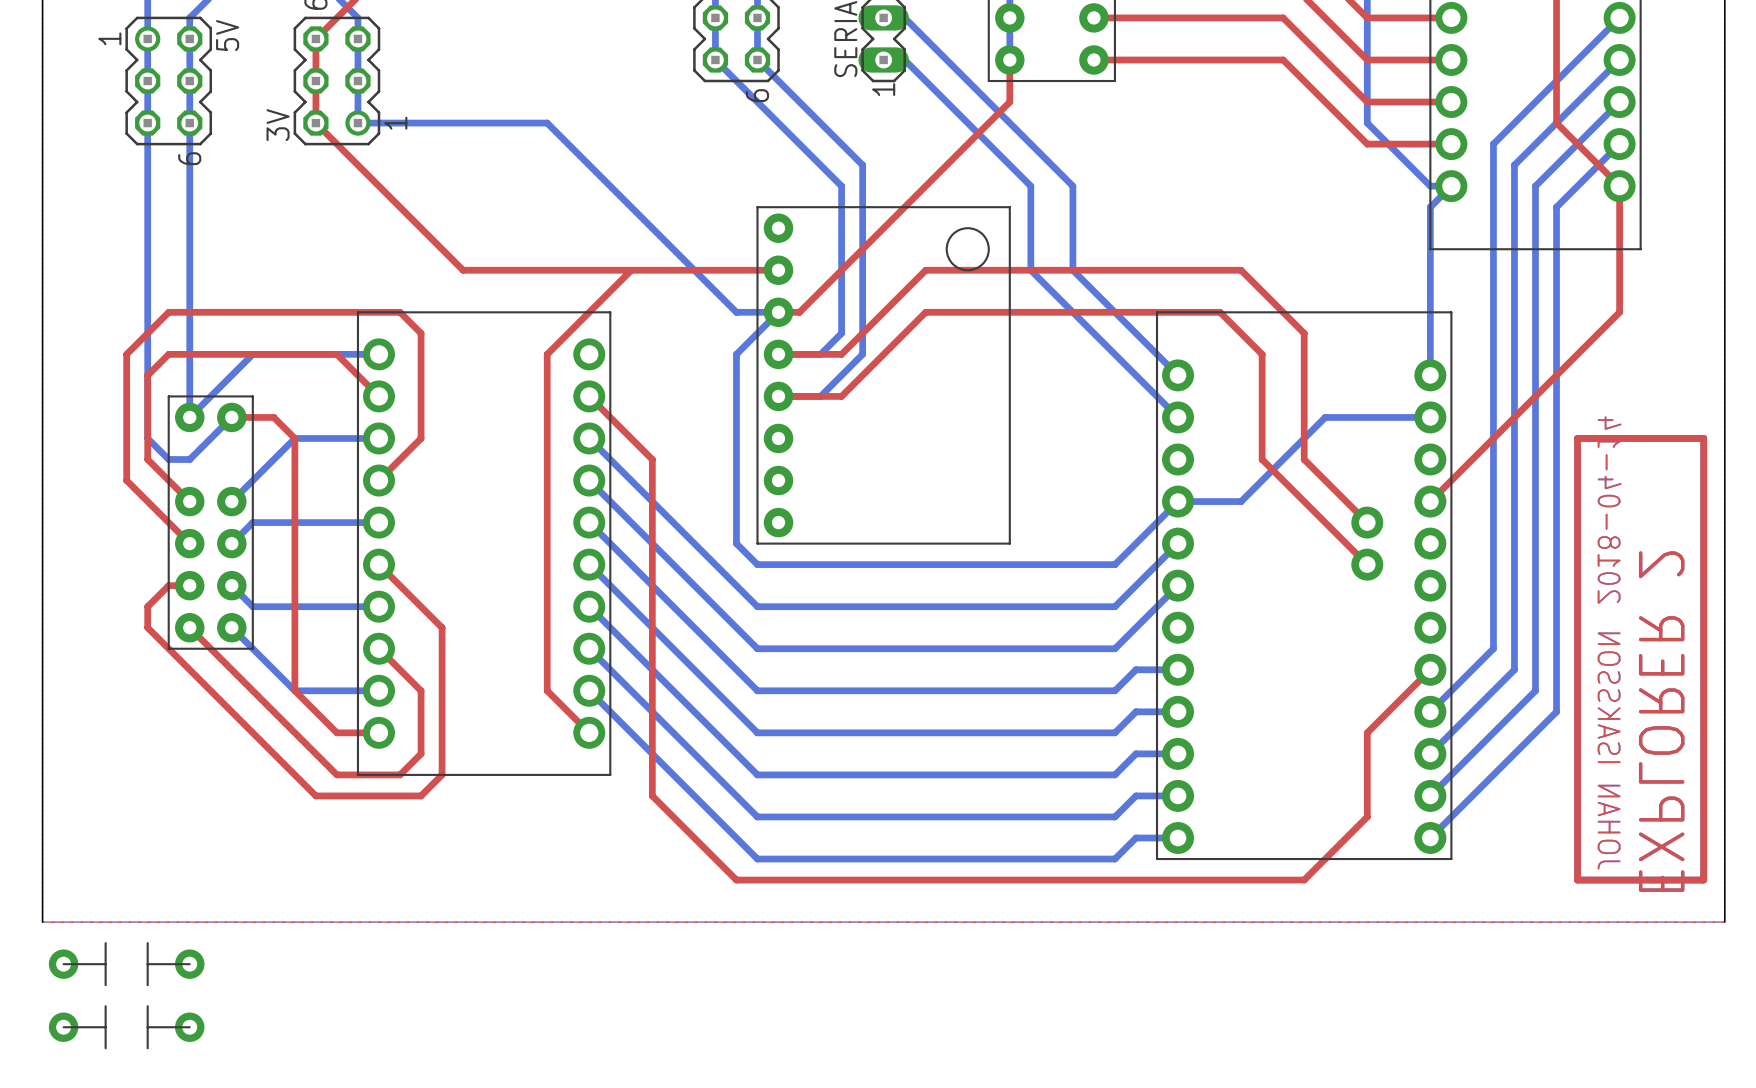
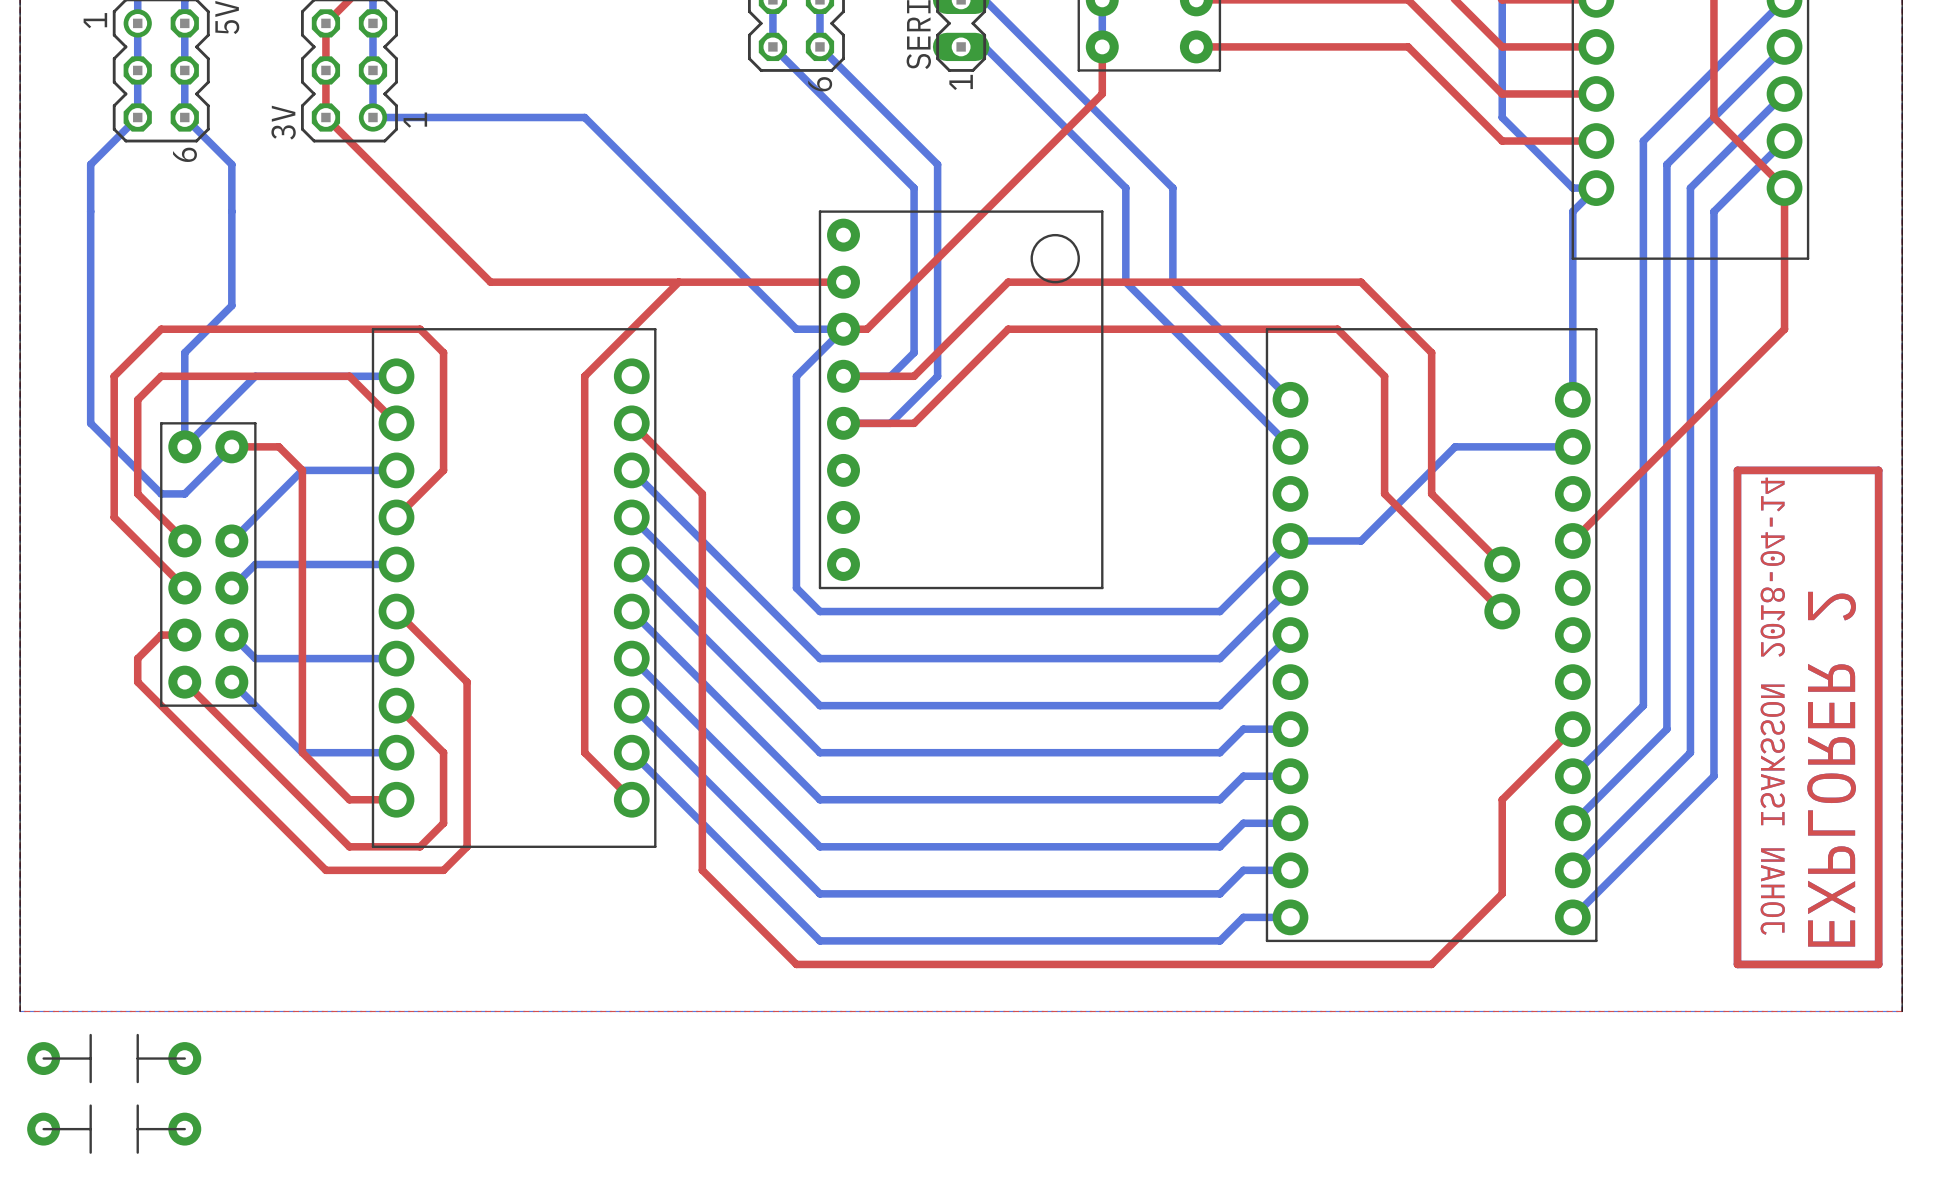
bottom track: (147, 123) (147, 438) -> (137, 117) (90, 164) (90, 423) (137, 470)
bottom track: (189, 123) (189, 333) -> (184, 117) (231, 164) (231, 305) (184, 352)

